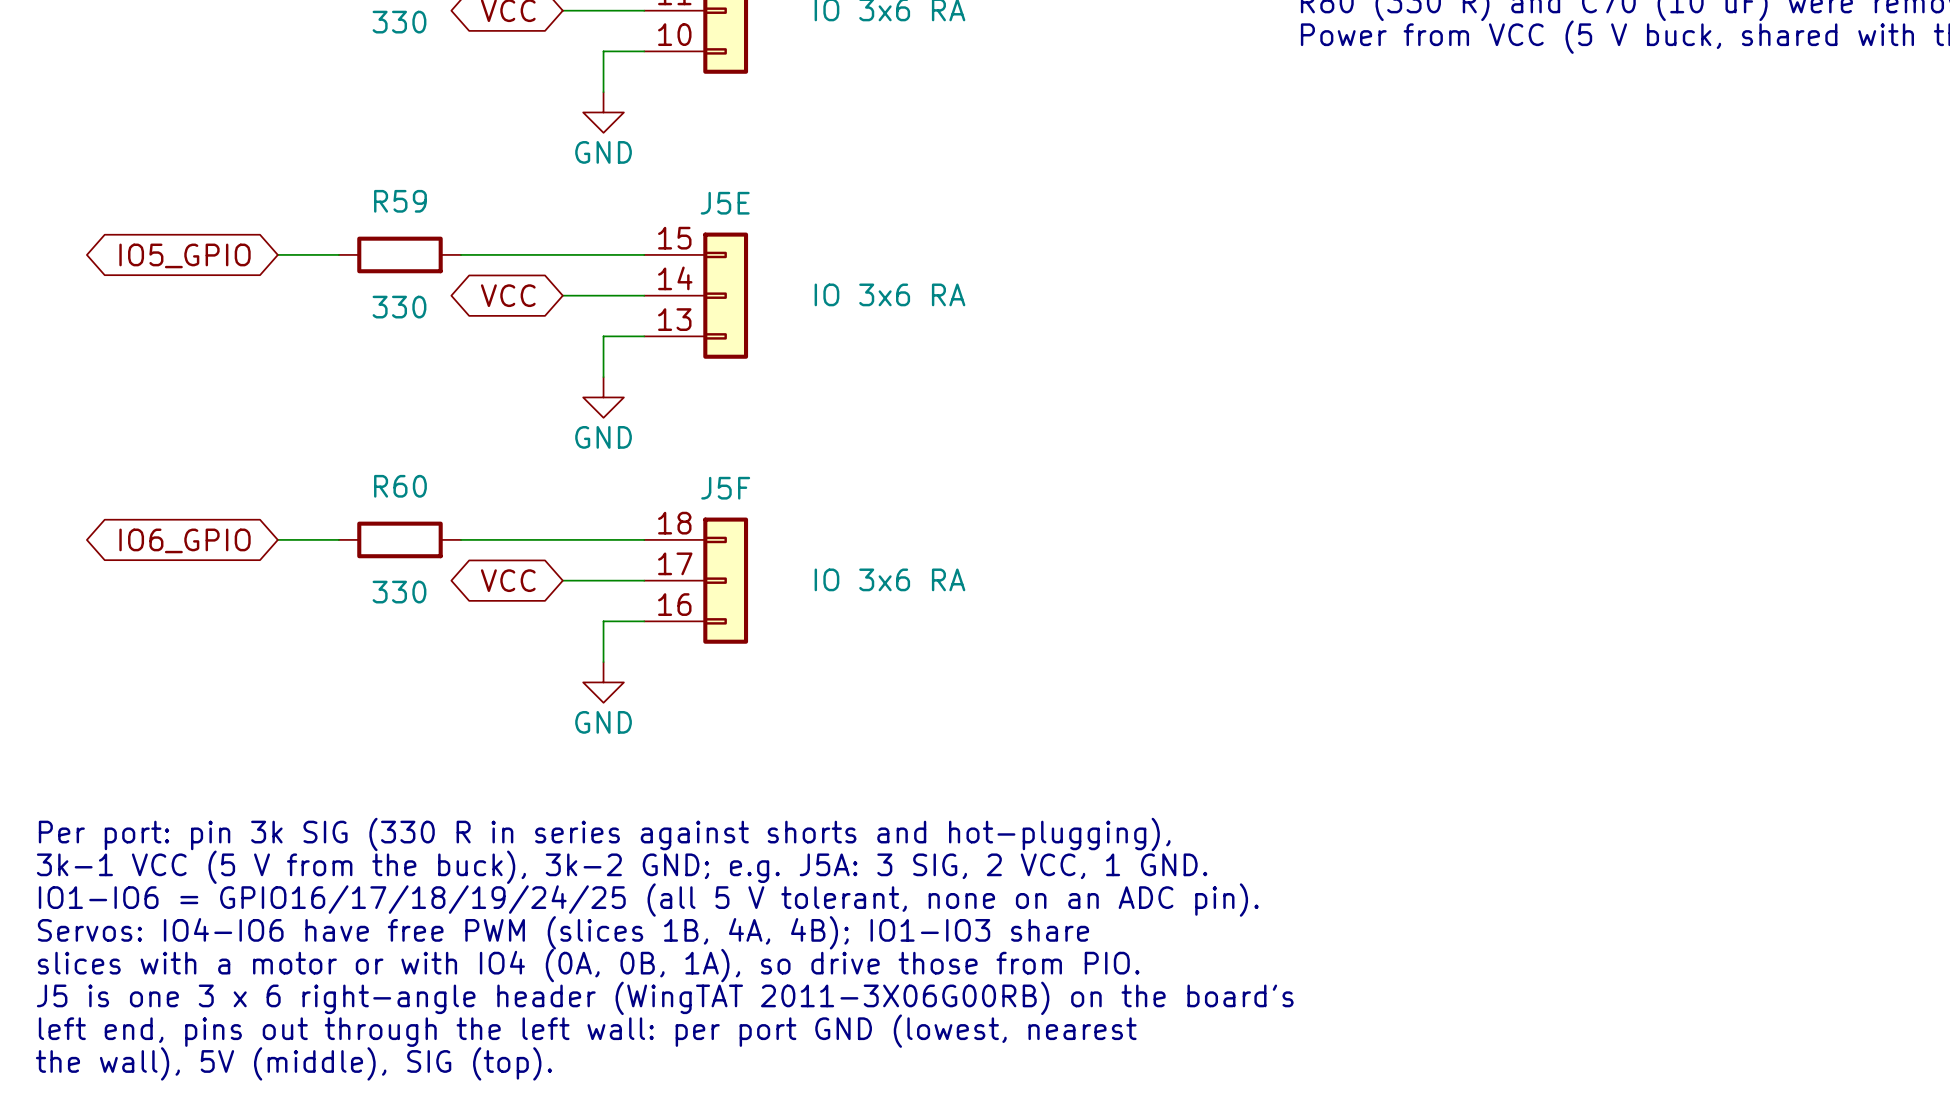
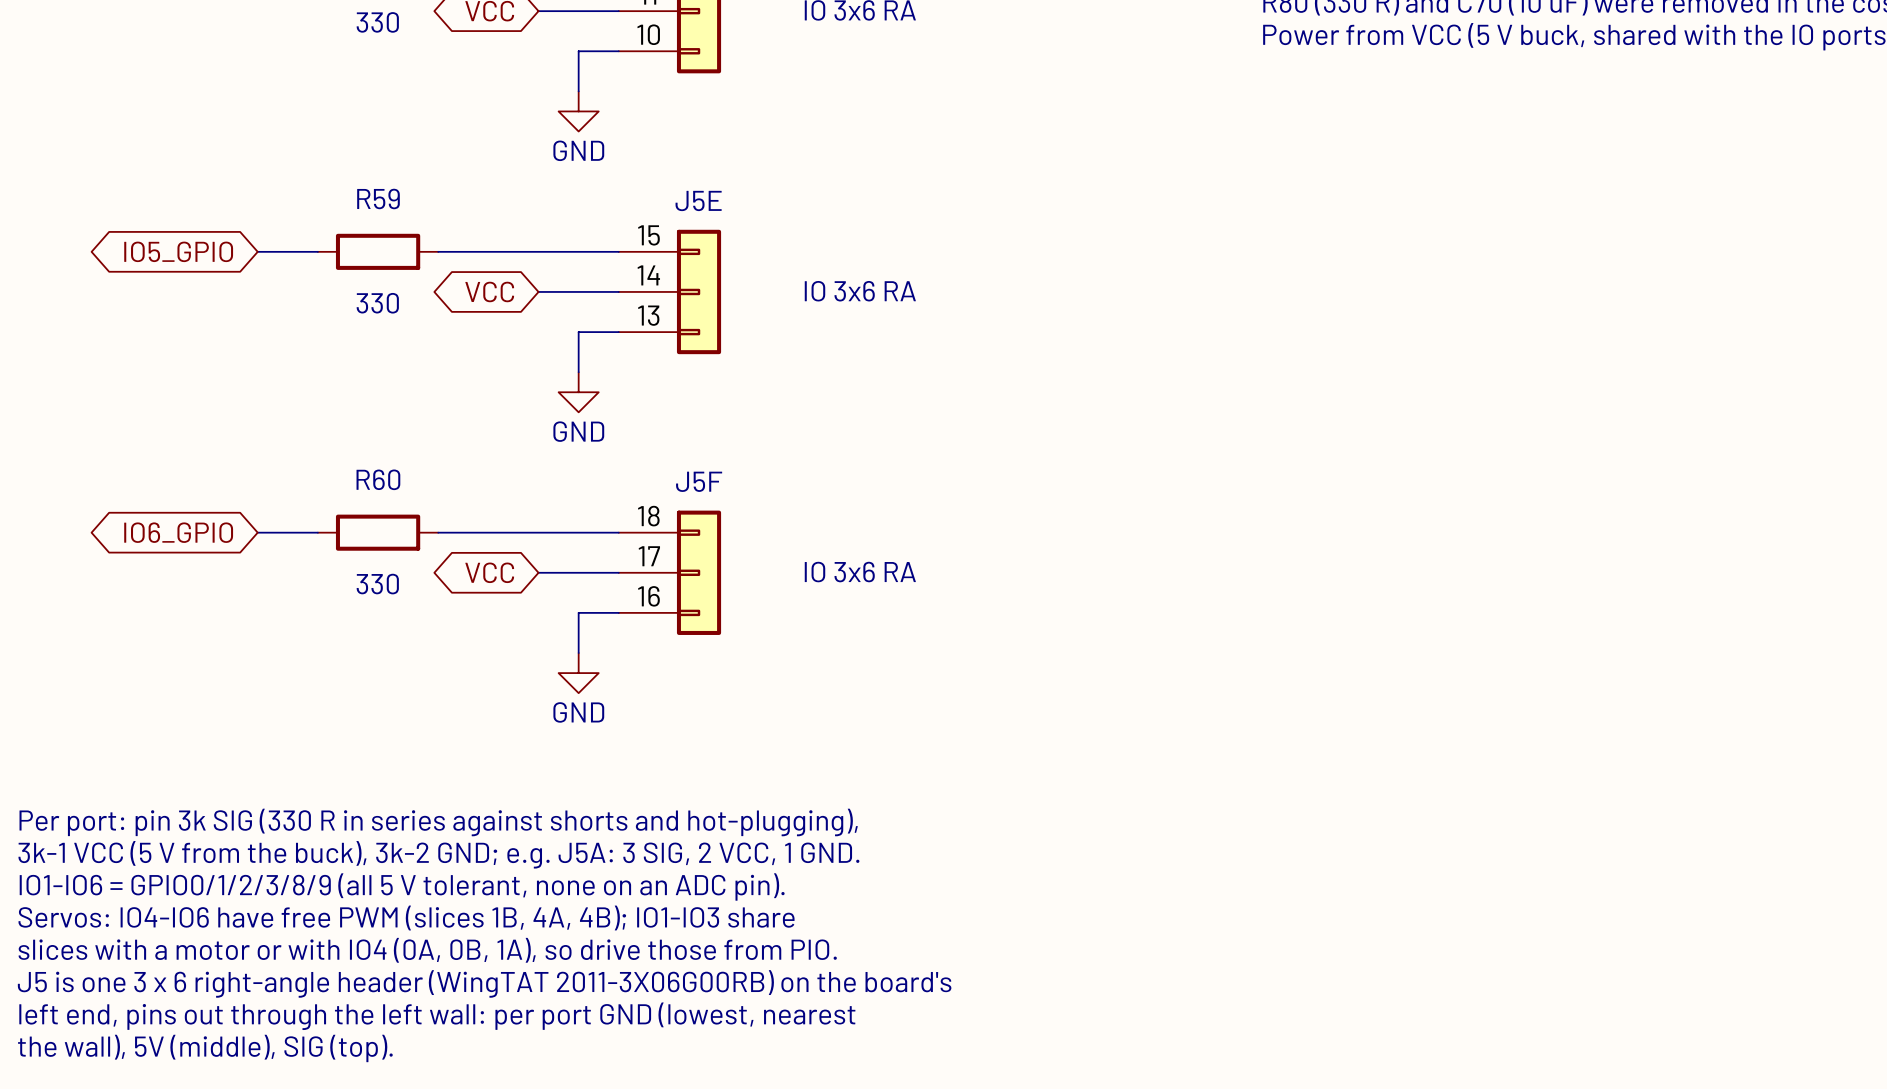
text: IO1-IO6 = GPIO16/17/18/19/24/25 (all 5 V tolerant, none on an ADC pin). (648, 900) -> IO1-IO6 = GPIO0/1/2/3/8/9 (all 5 V tolerant, none on an ADC pin). (402, 886)

